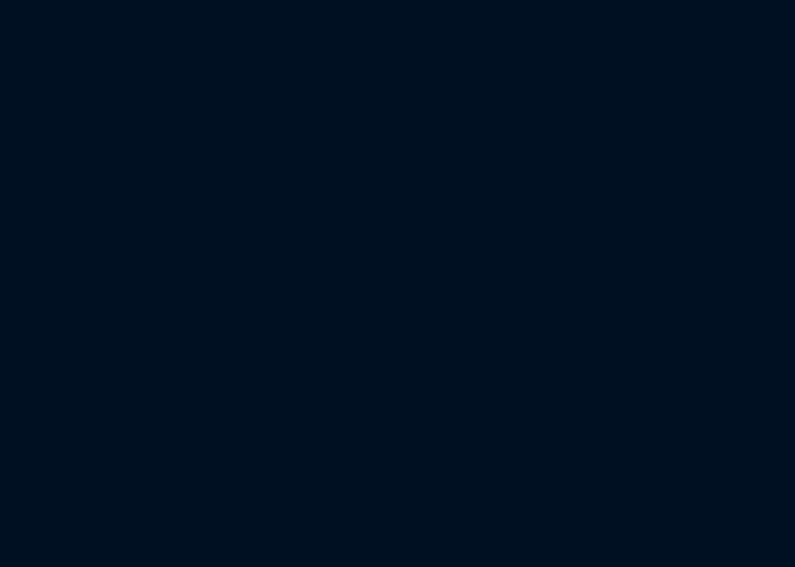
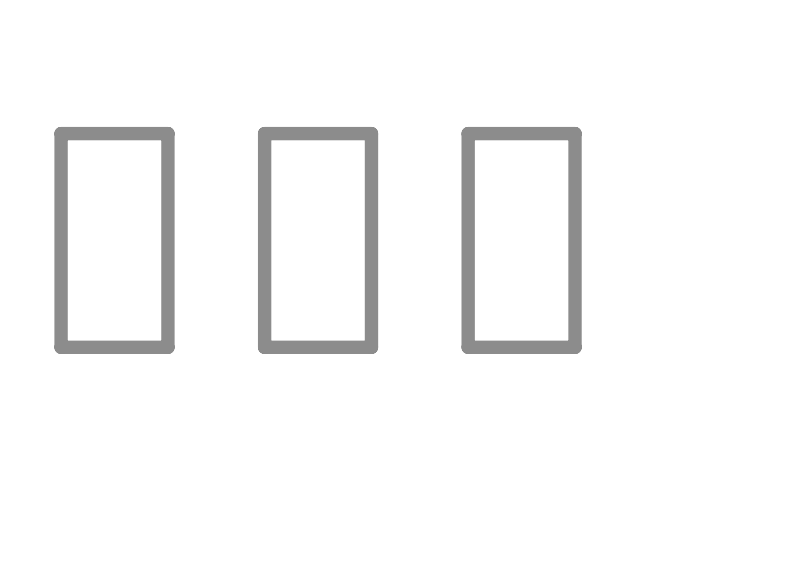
part: none -> (114, 240)
part: none -> (318, 240)
part: none -> (521, 240)

